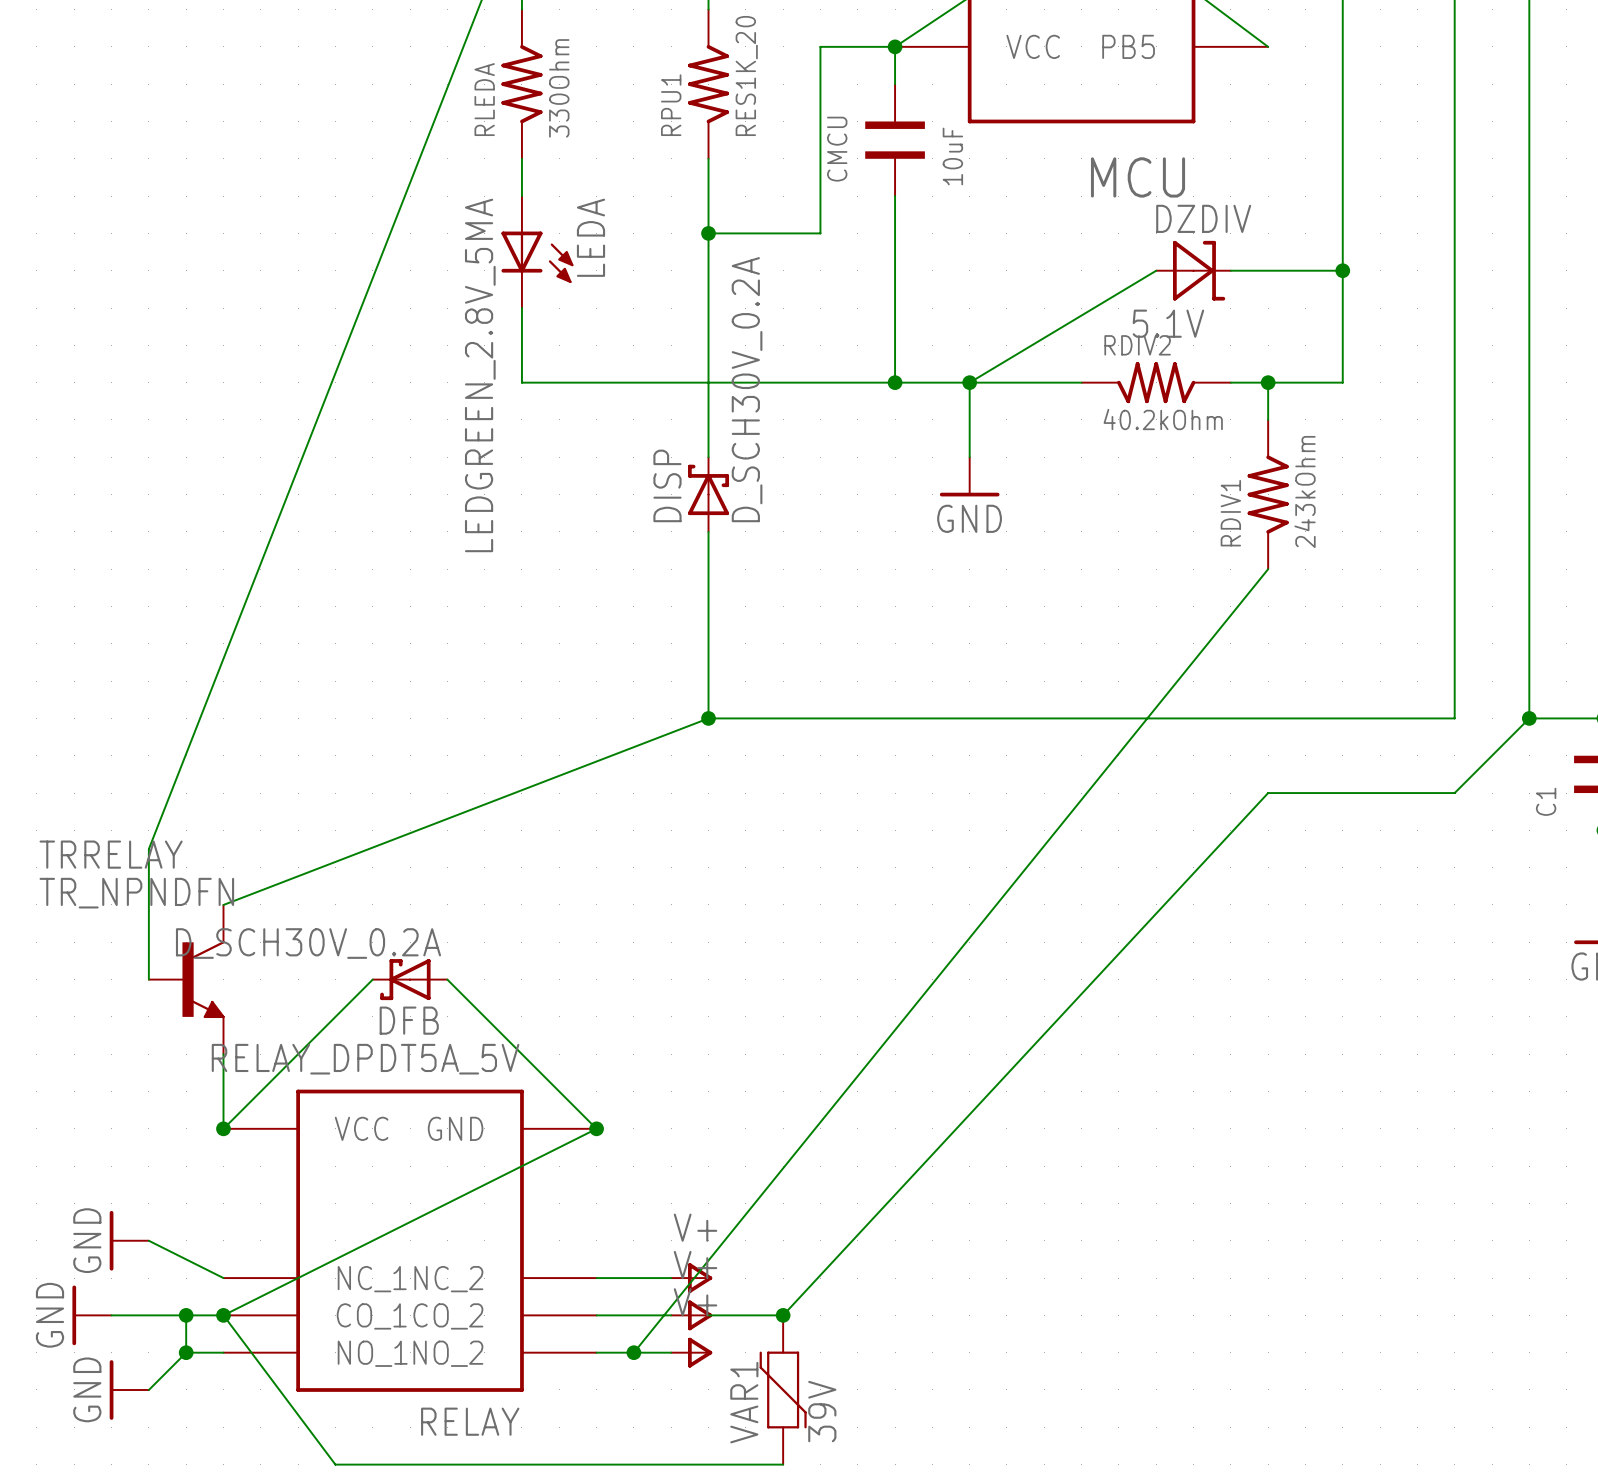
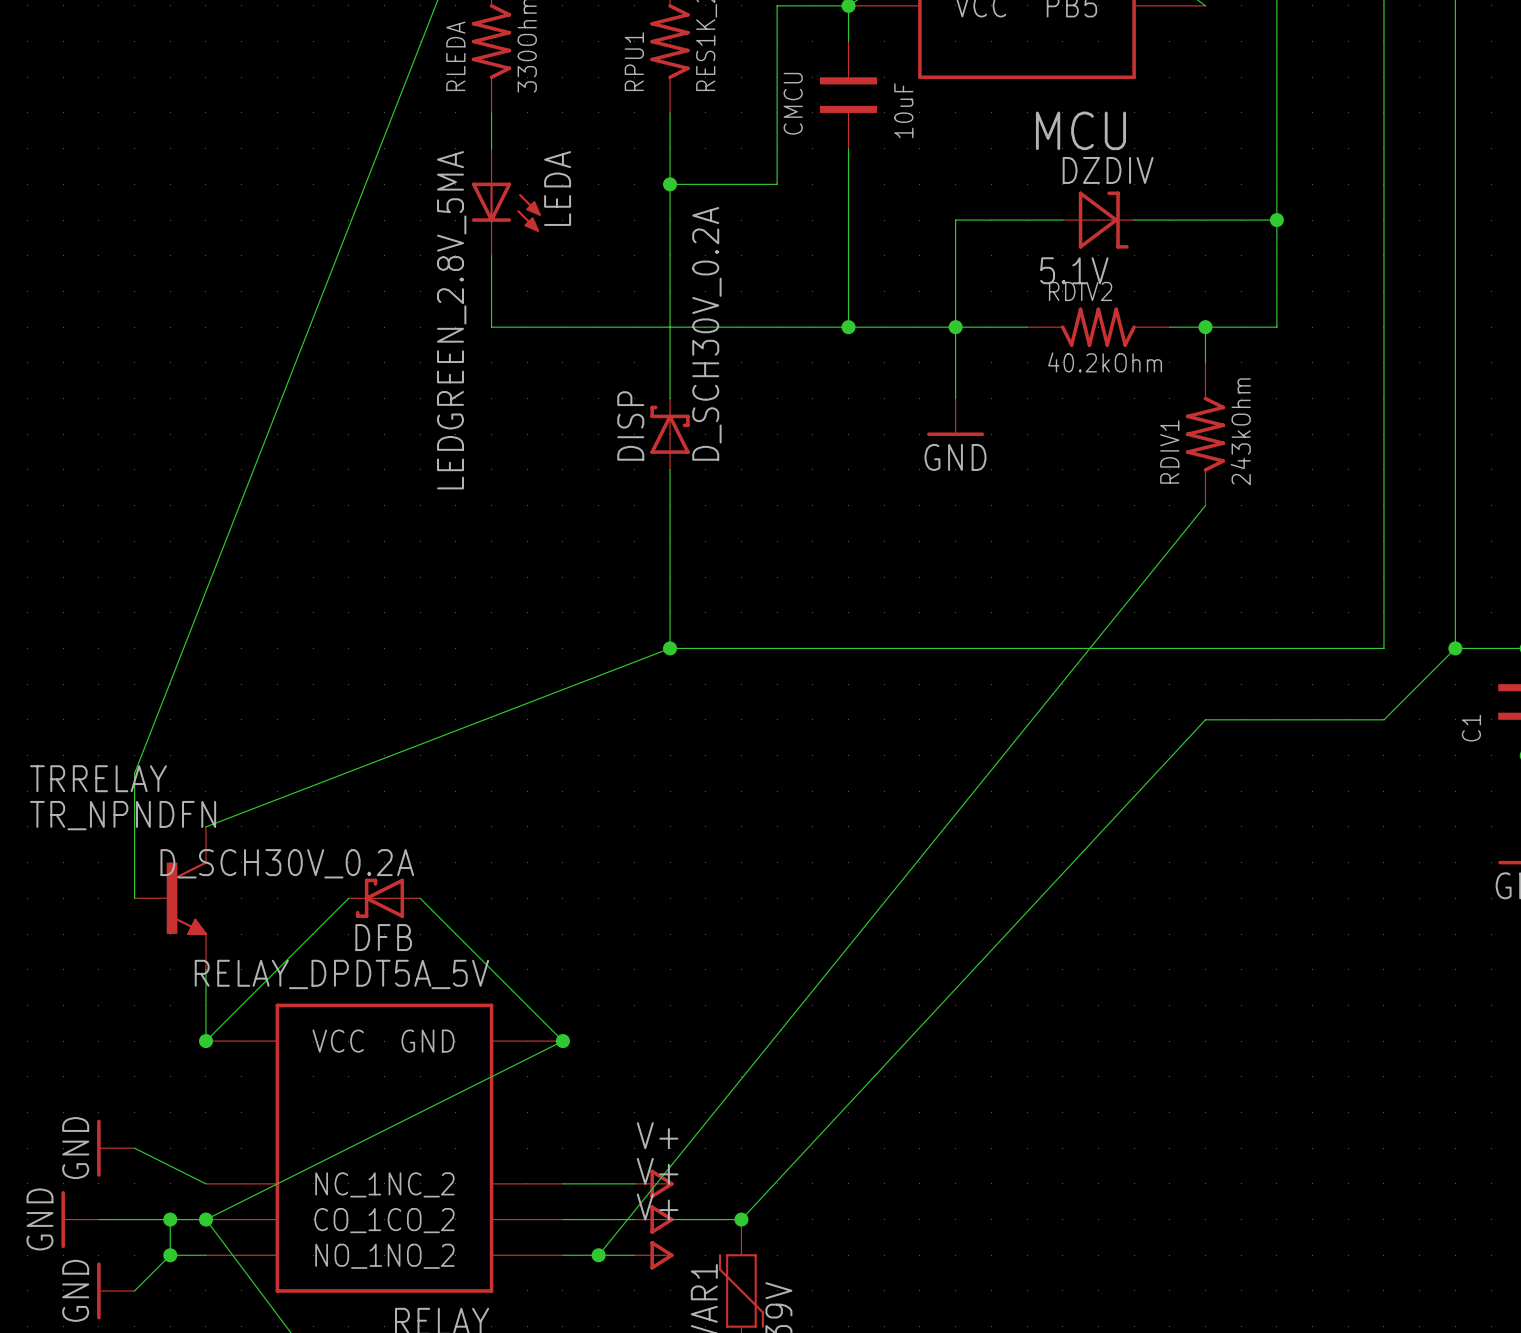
wire: none -> (1062, 220) (955, 220) (955, 398)
wire: (1156, 270) (969, 382) (969, 457) -> none
DZDIV position: (1193, 270) -> (1098, 220)
junction position: (969, 382) -> (955, 327)
power symbol position: GND (969, 476) -> GND (955, 417)

